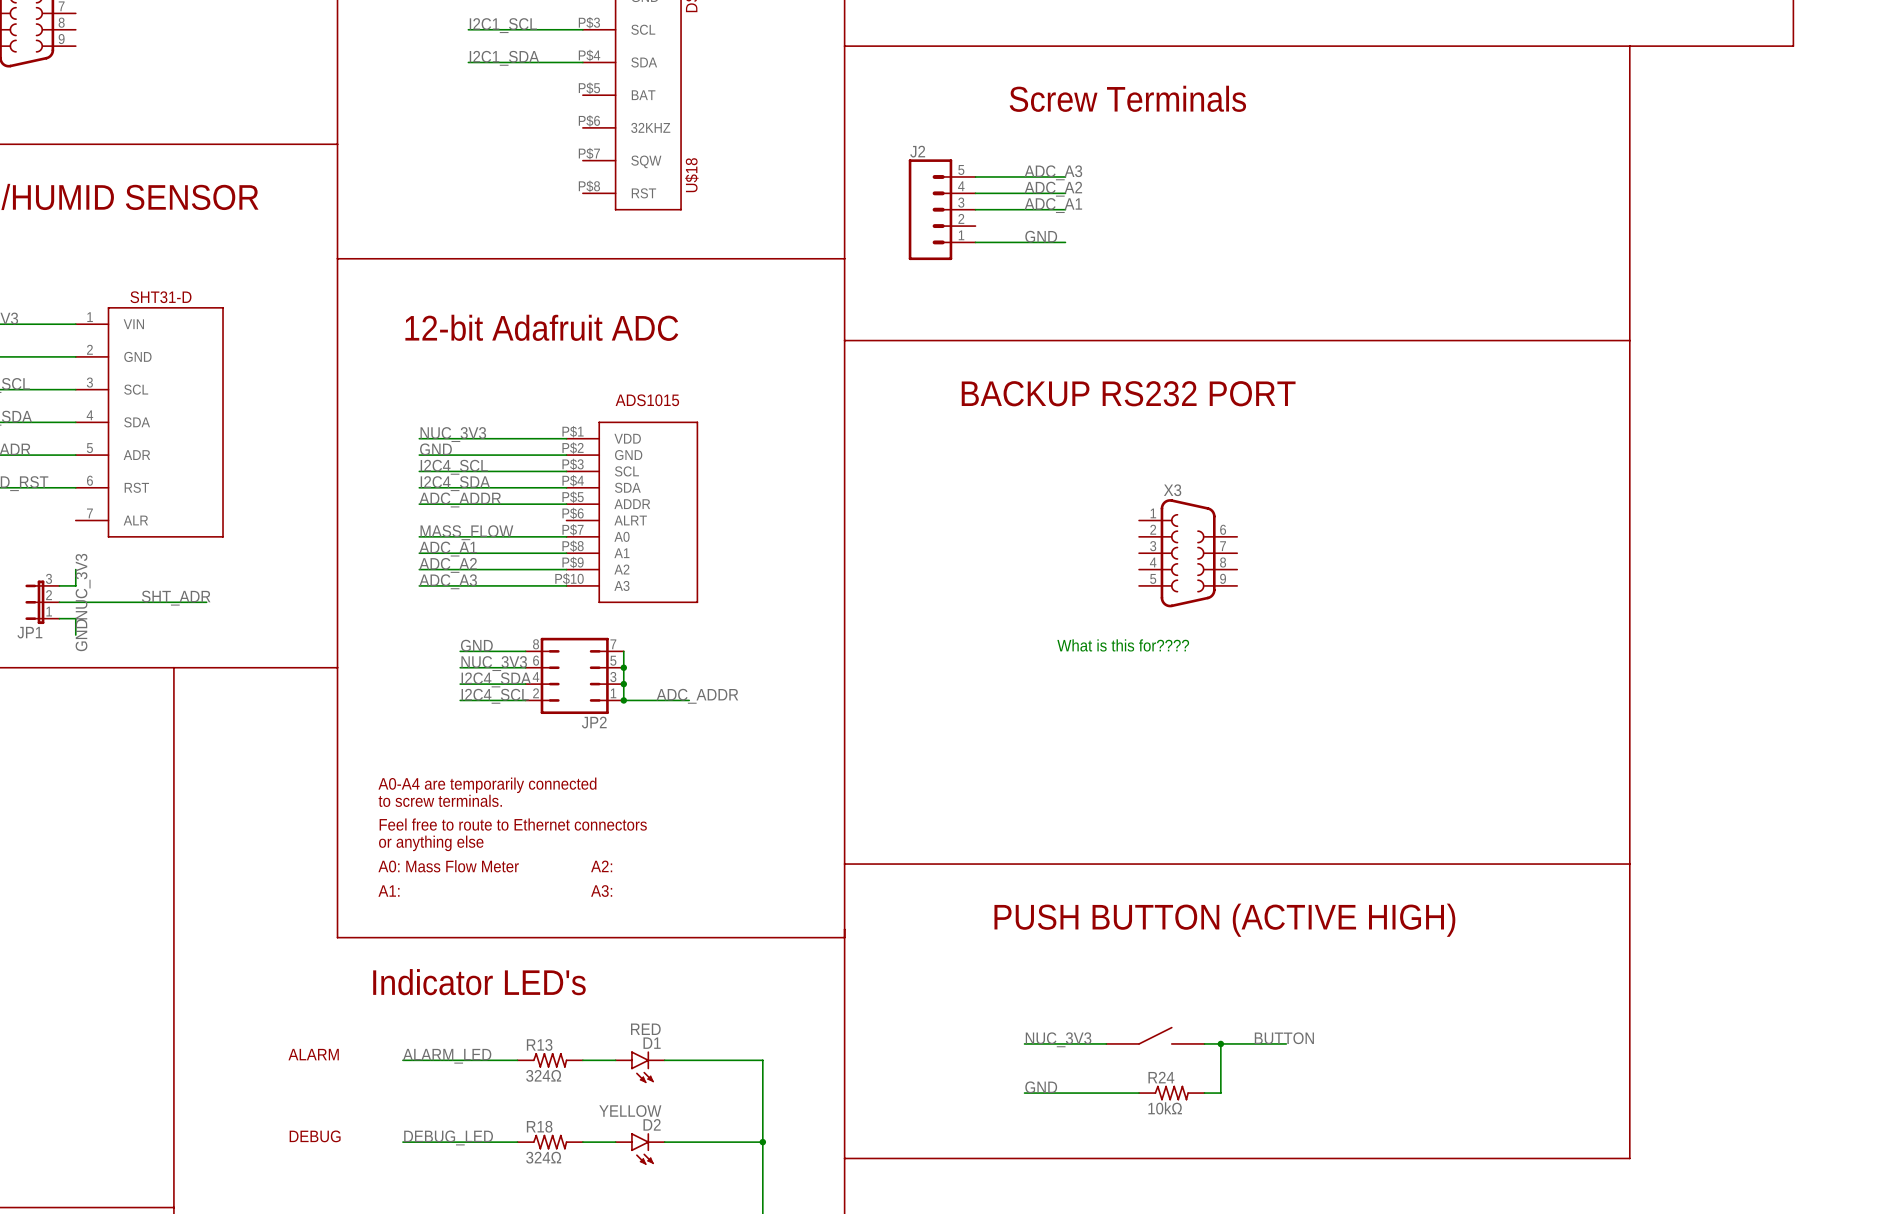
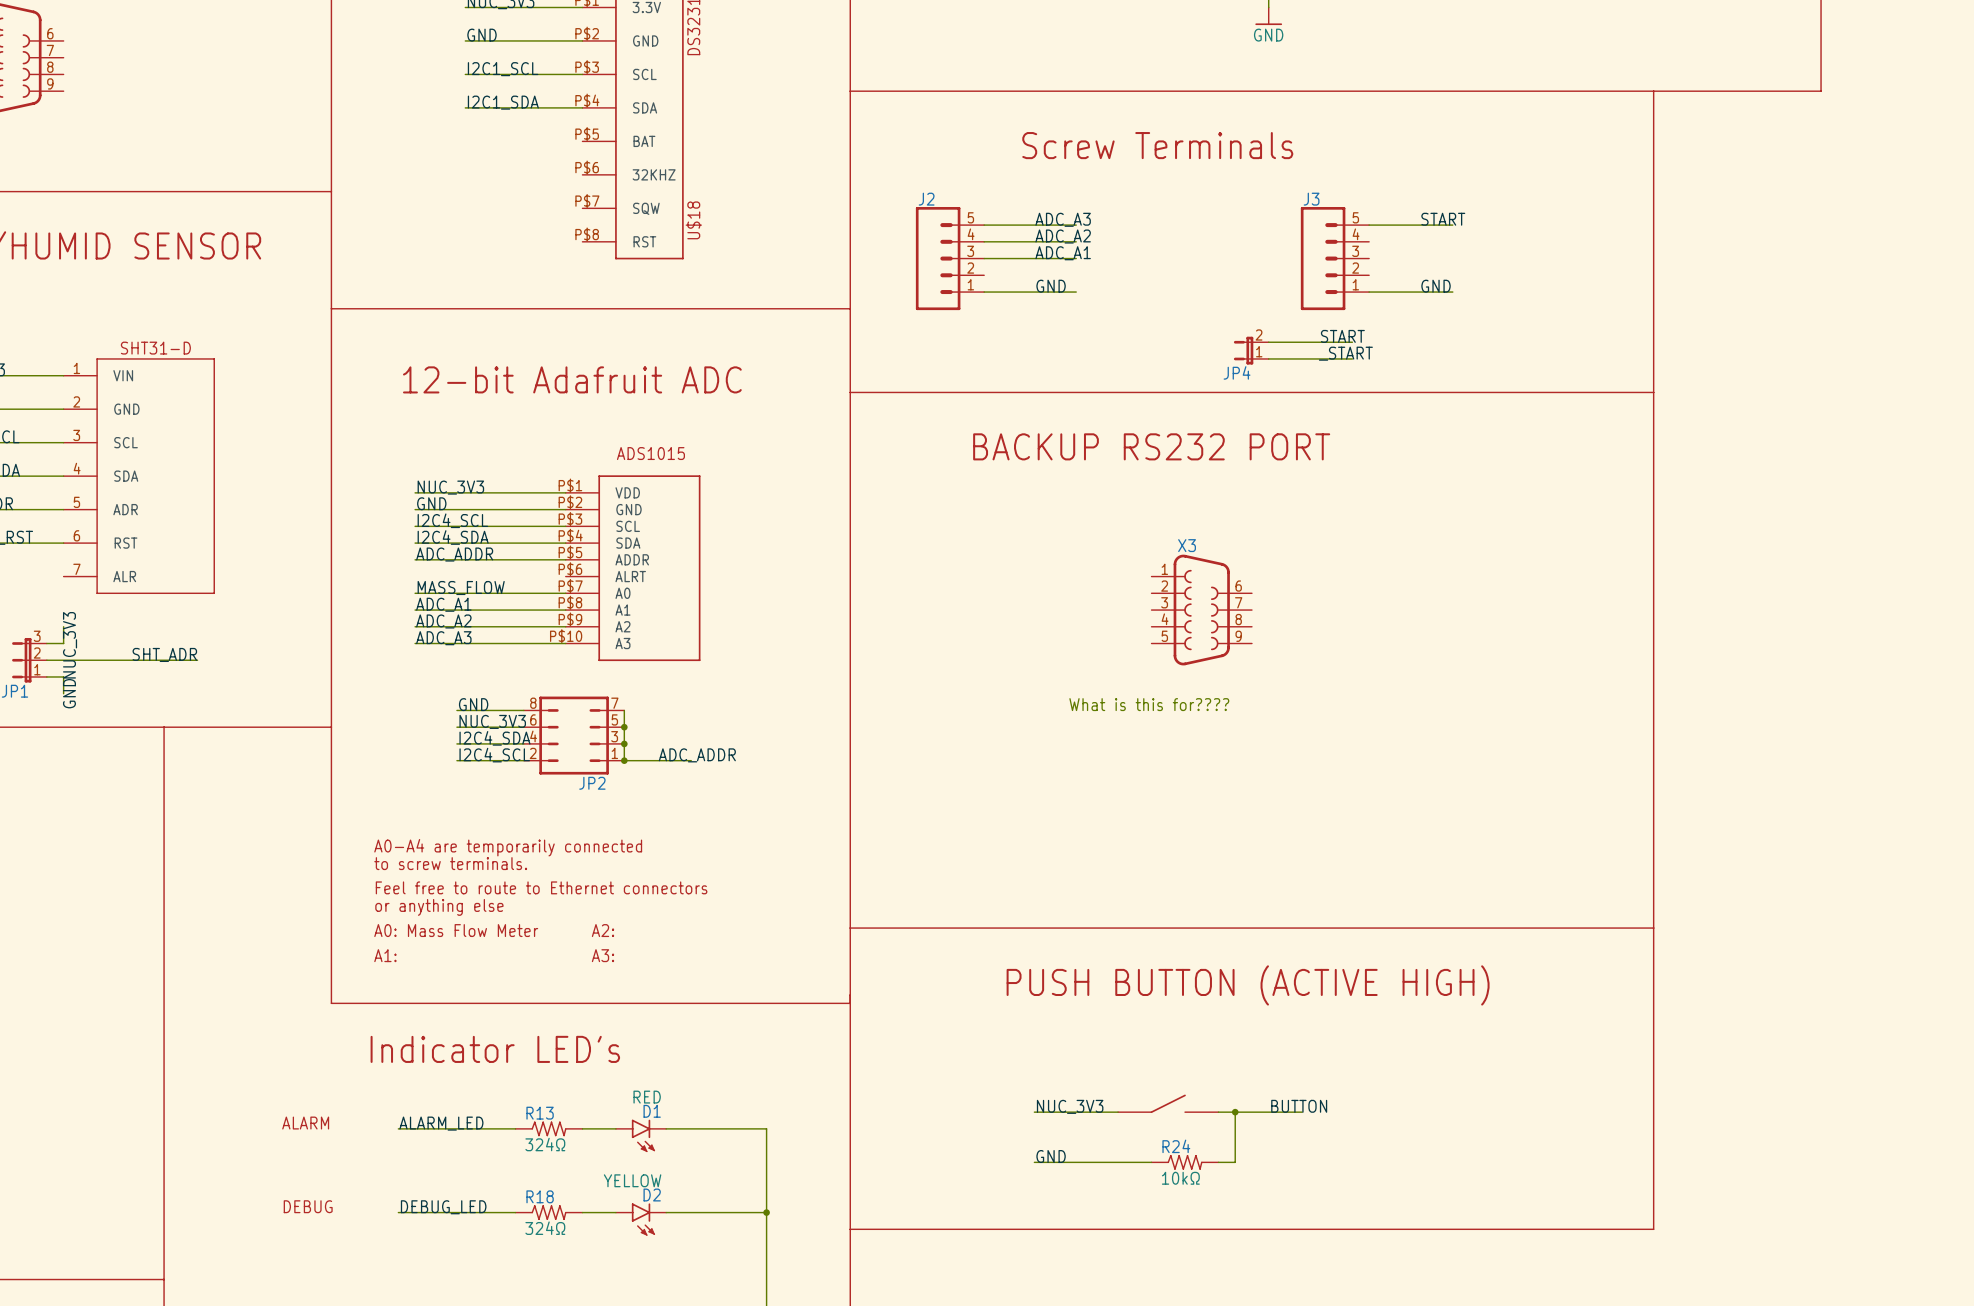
label: none -> START (1443, 219)
wire: none -> (1369, 225) (1452, 225)
J3: none -> (1334, 258)
label: none -> GND (1436, 286)
wire: none -> (1369, 292) (1452, 292)
label: none -> START (1342, 336)
wire: none -> (1268, 342) (1352, 342)
JP4: none -> (1251, 350)
label: none -> _START (1345, 353)
wire: none -> (1268, 358) (1352, 358)

